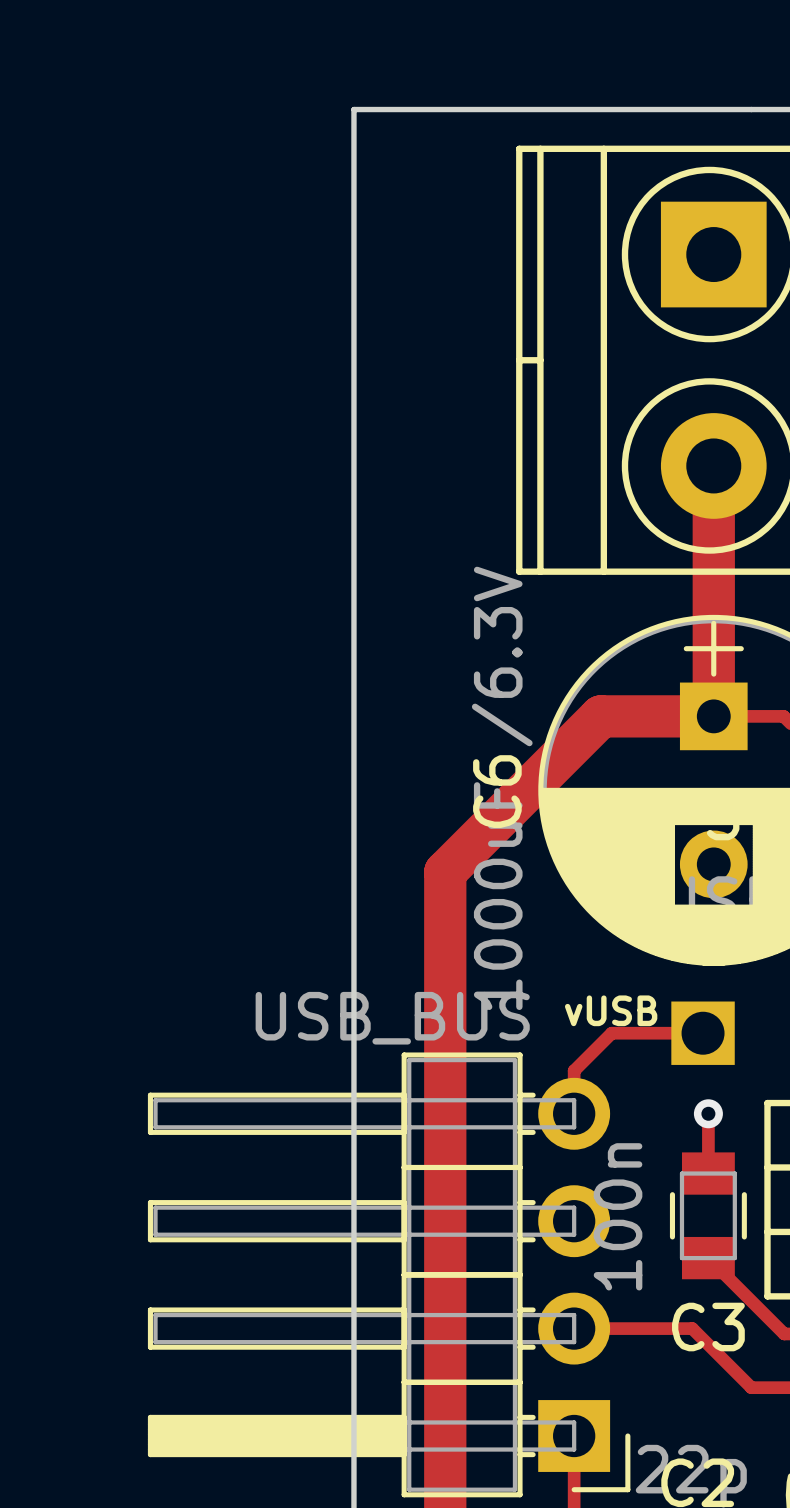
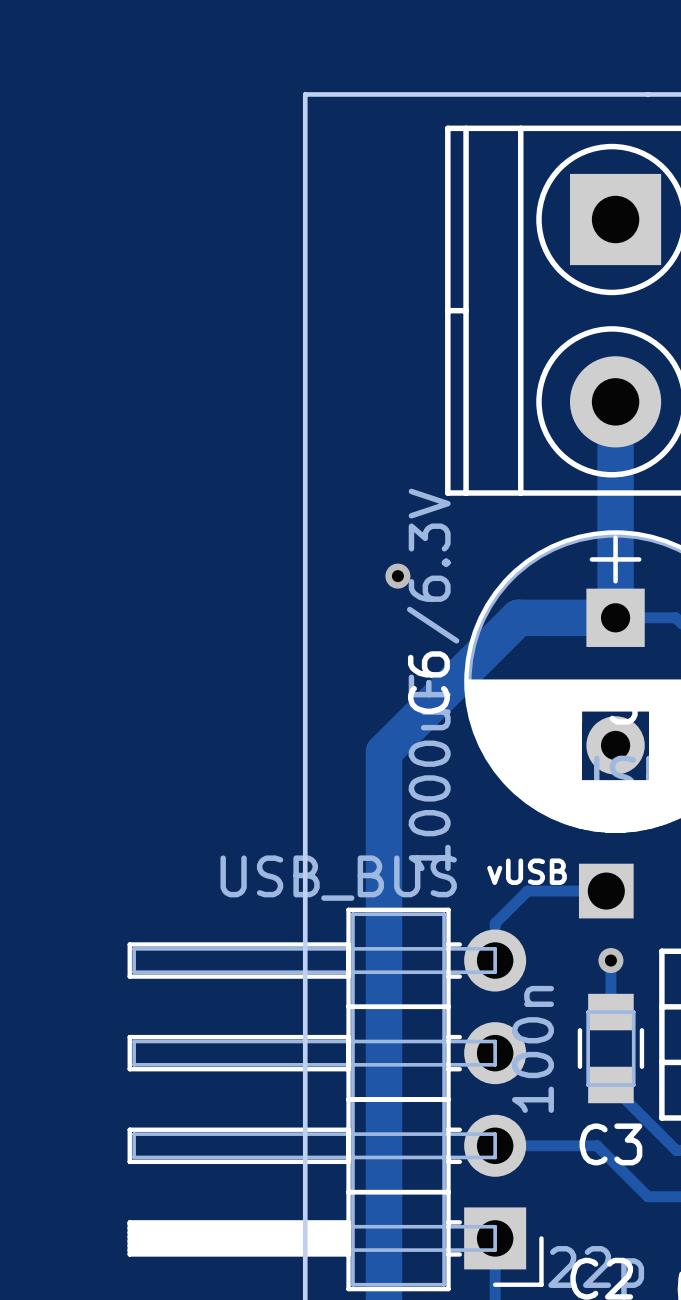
via: none -> (397, 576)

